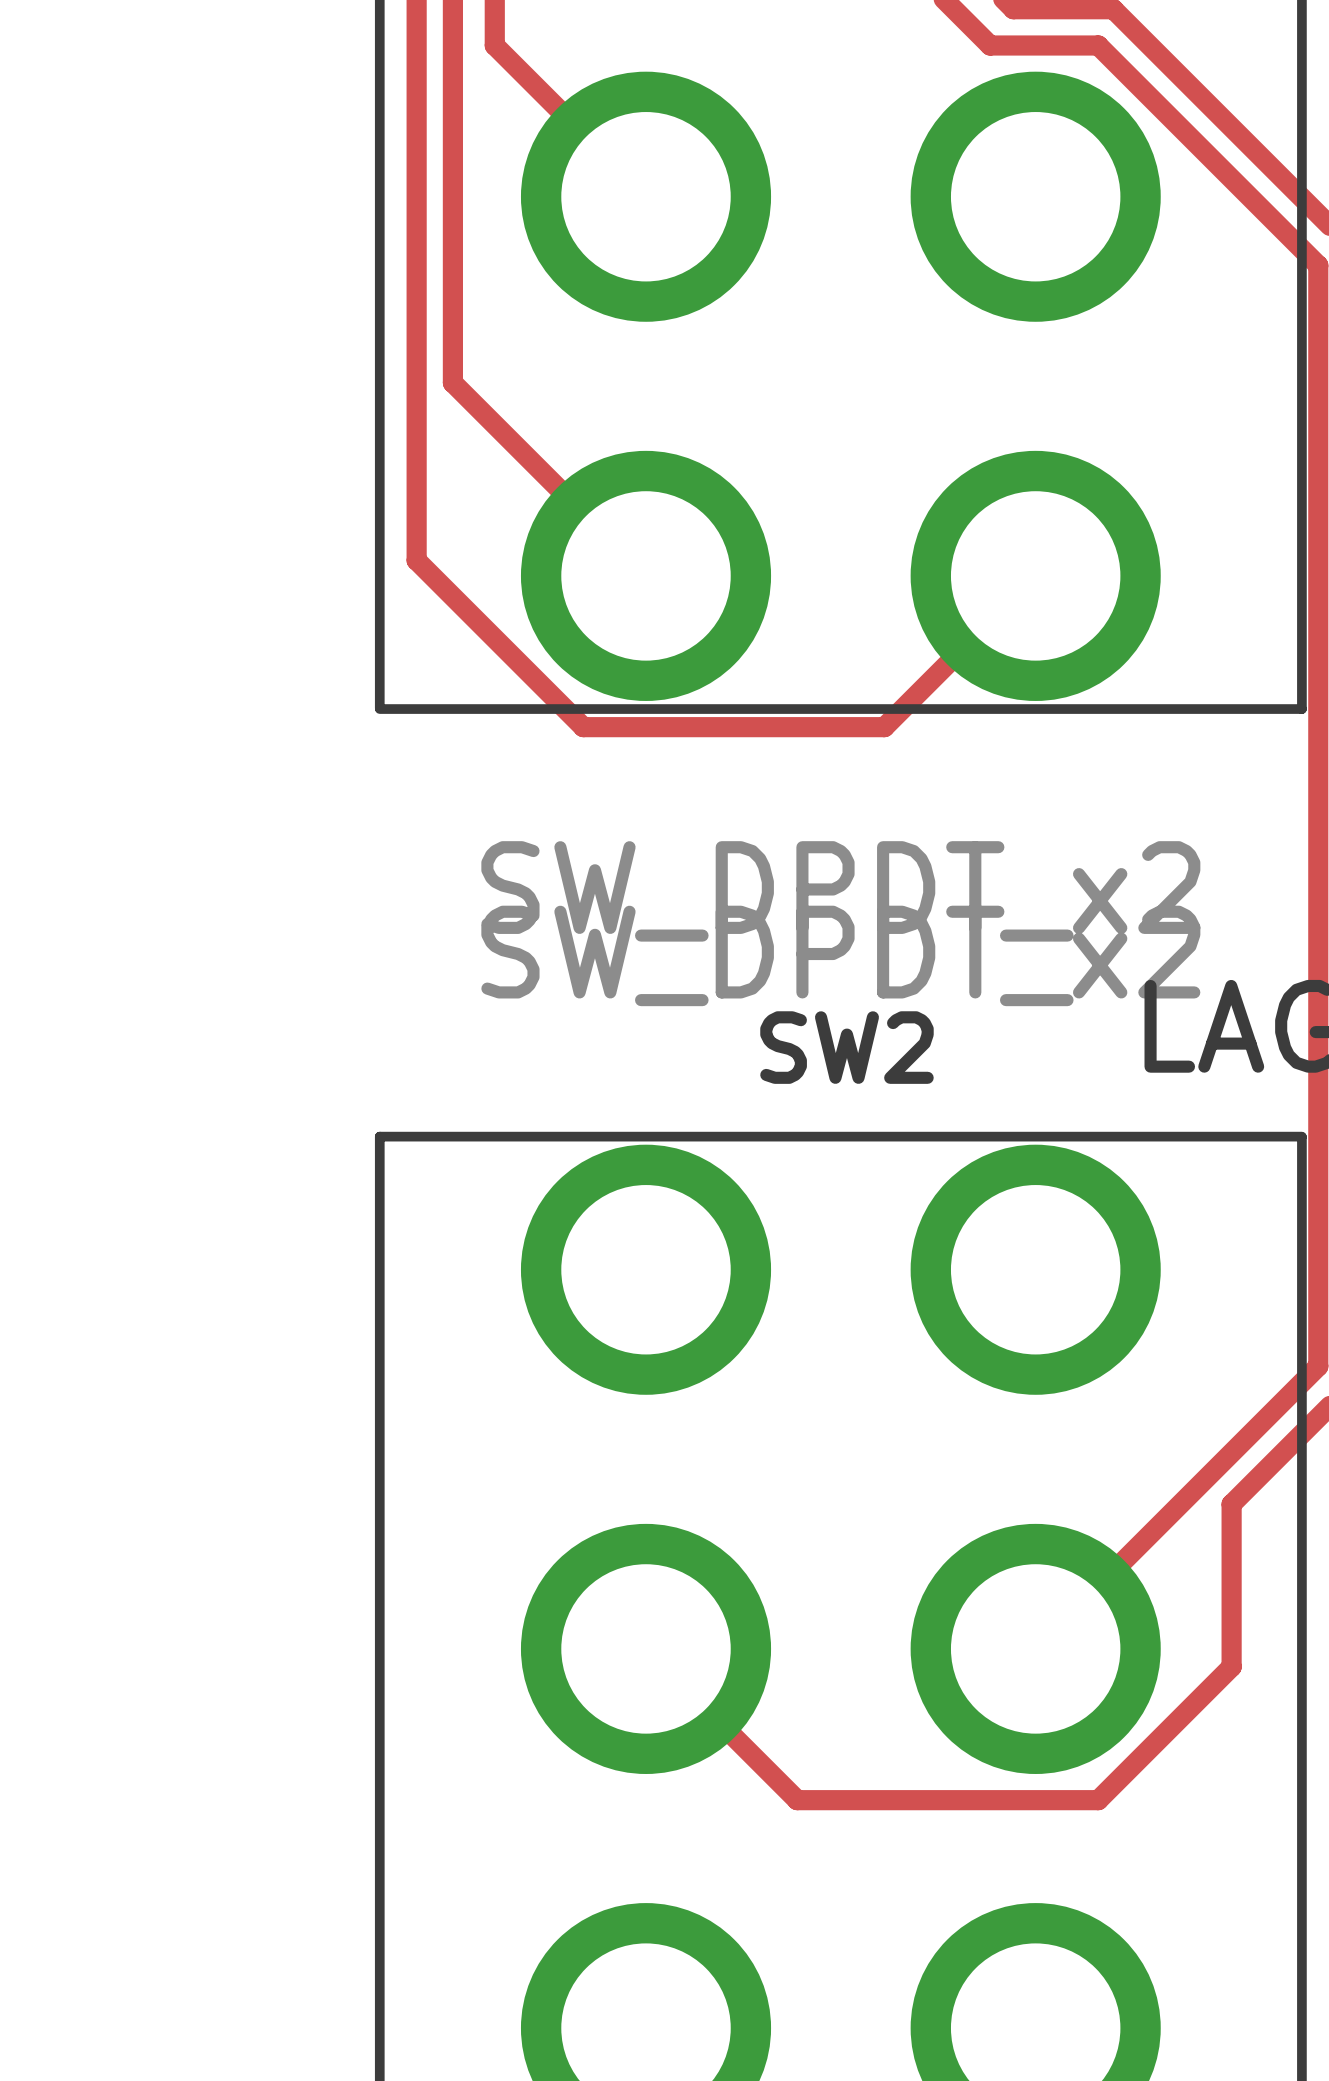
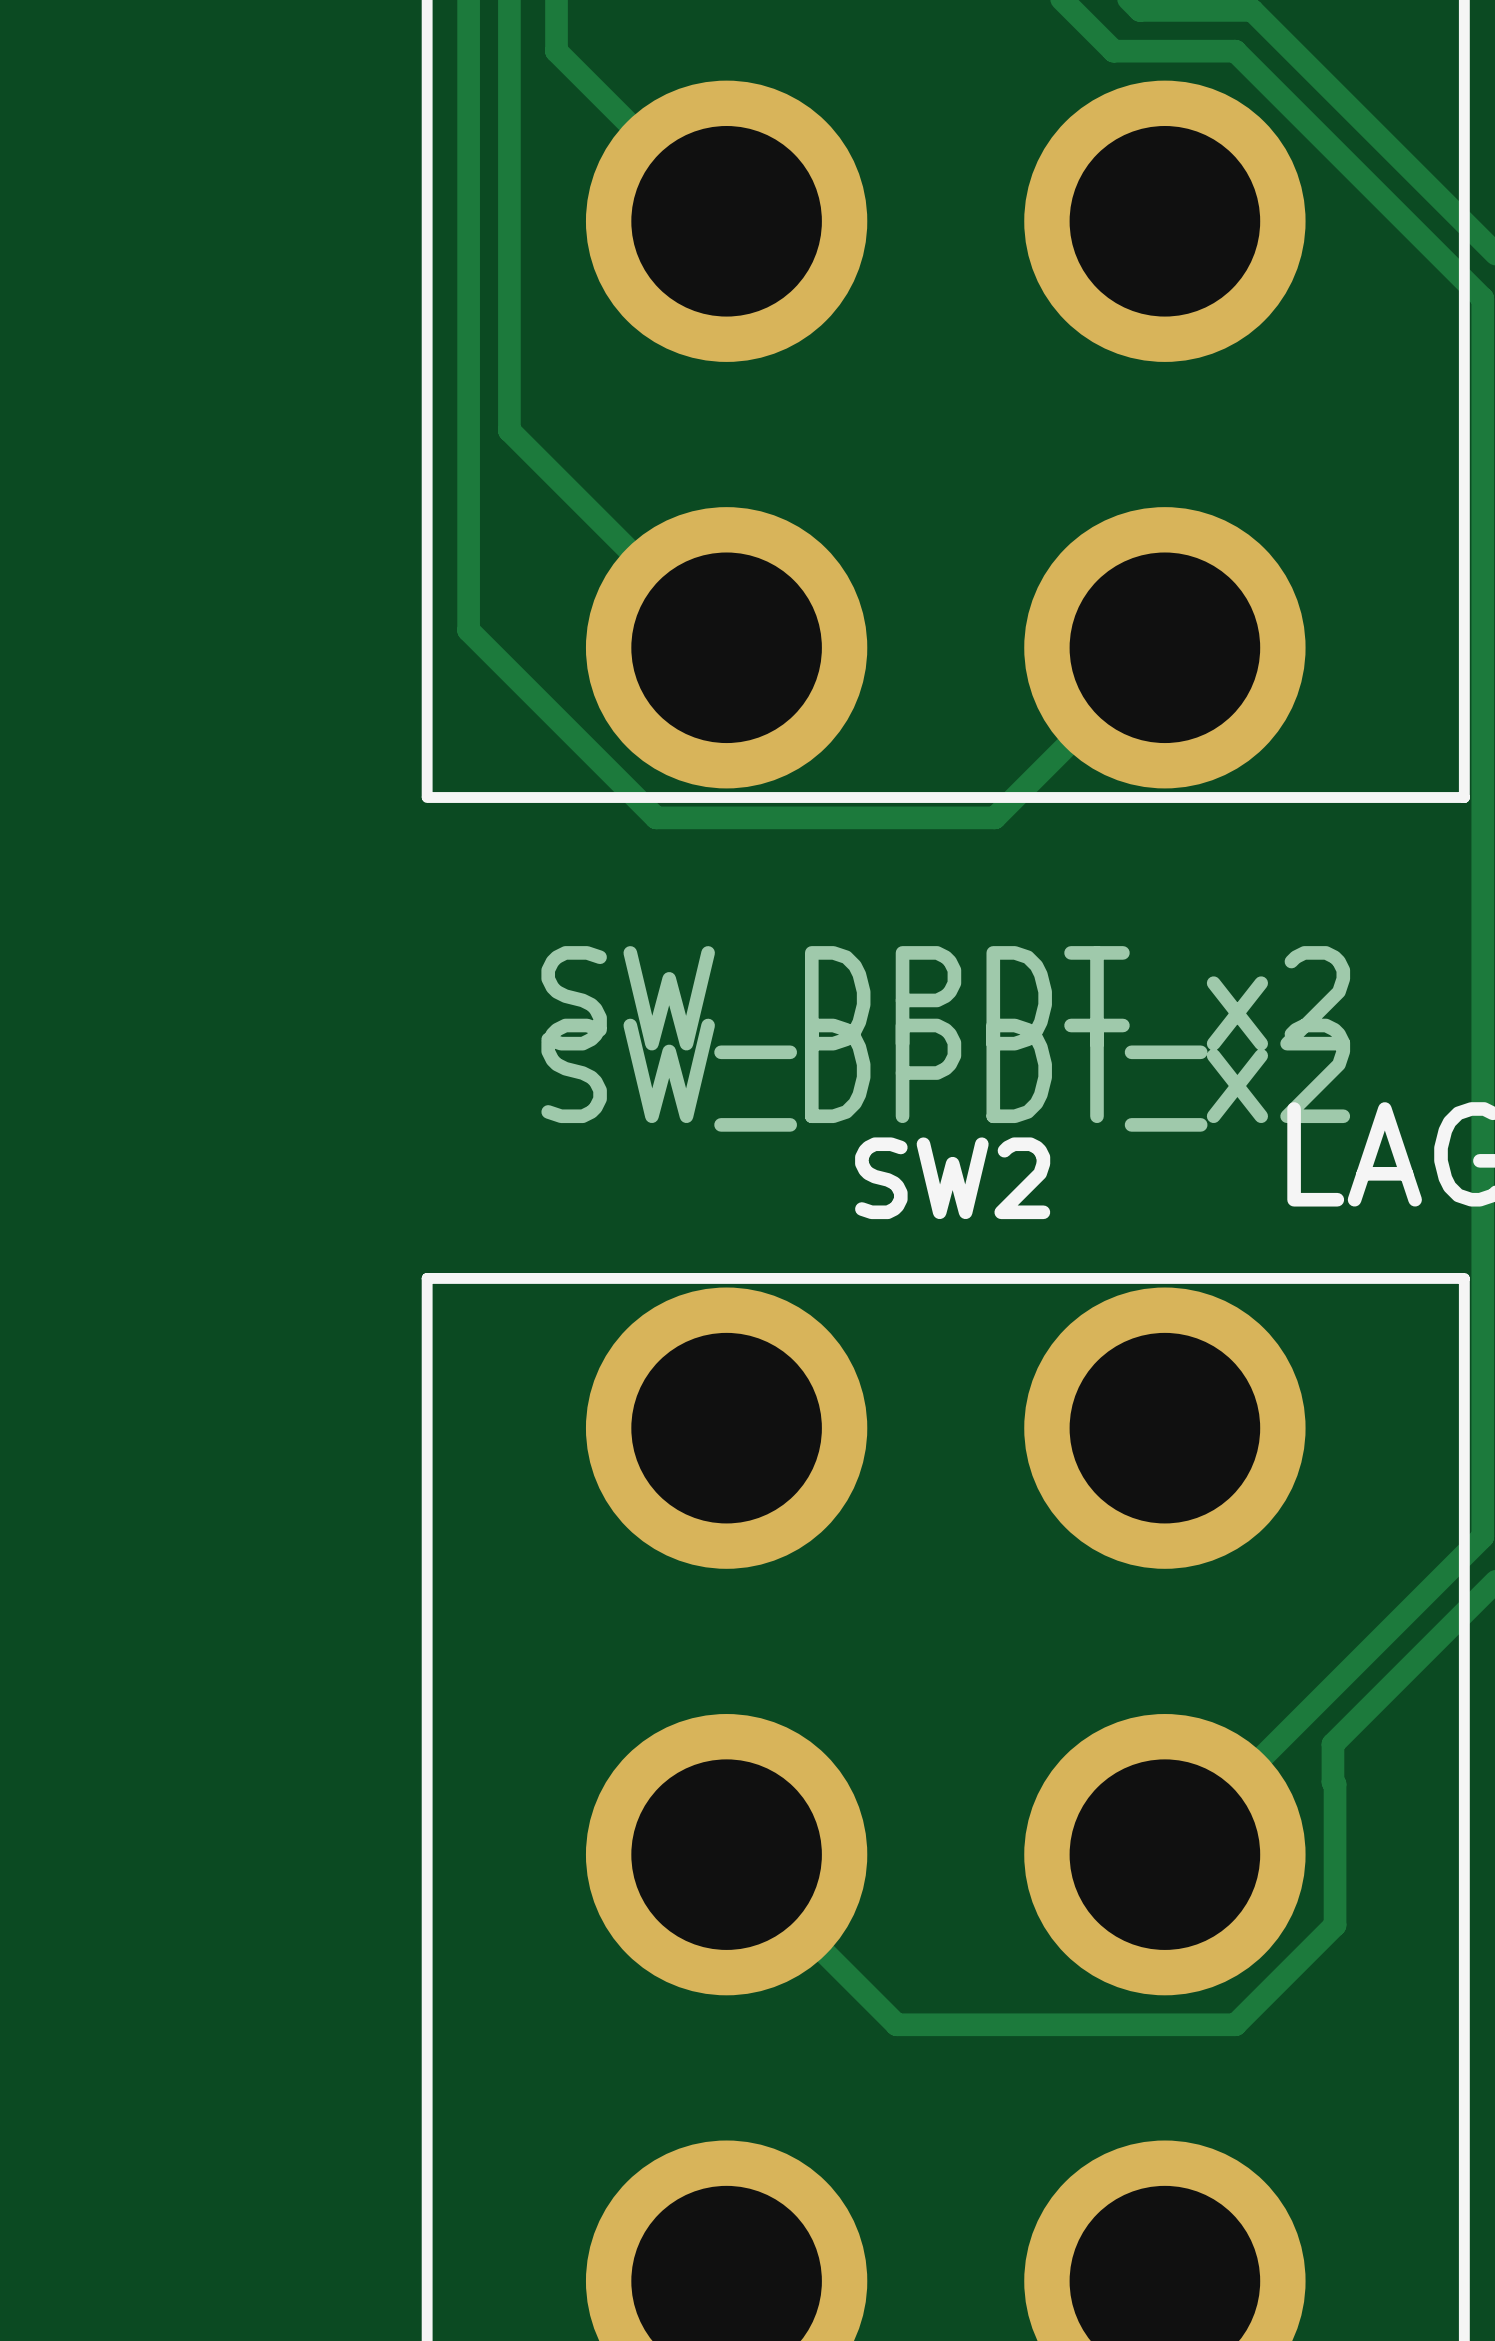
track: (1231, 1504) (1231, 1666) (1186, 1711) -> (1385, 1691) (1332, 1744) (1332, 1782) (1335, 1784) (1335, 1925)

